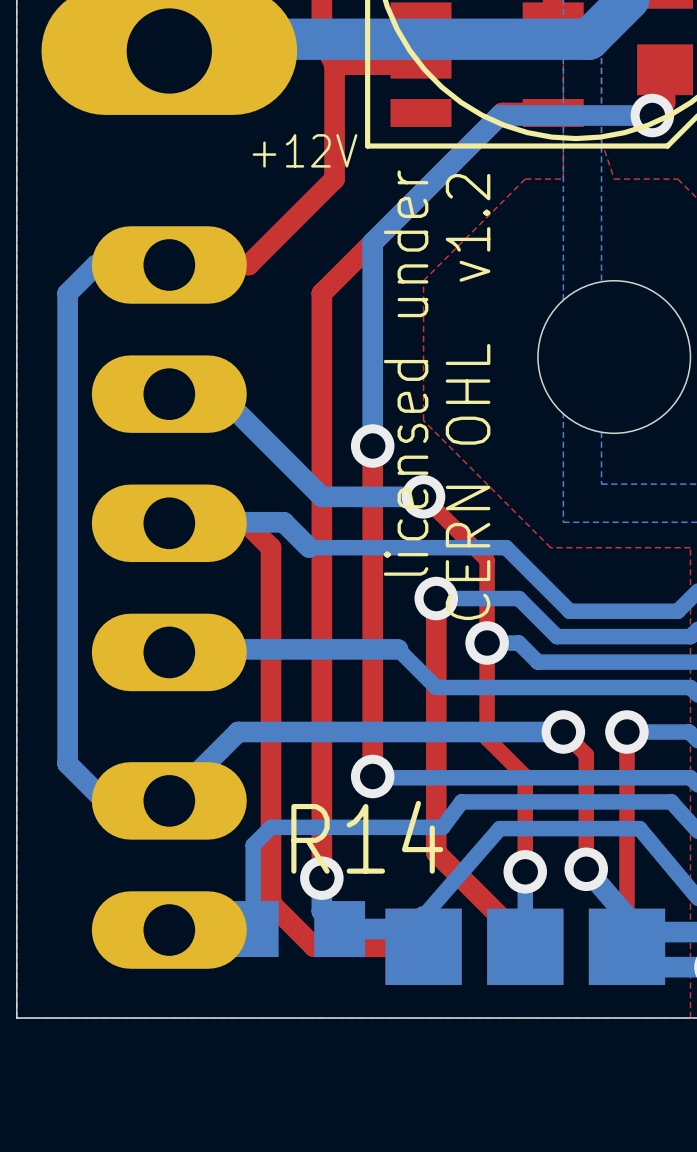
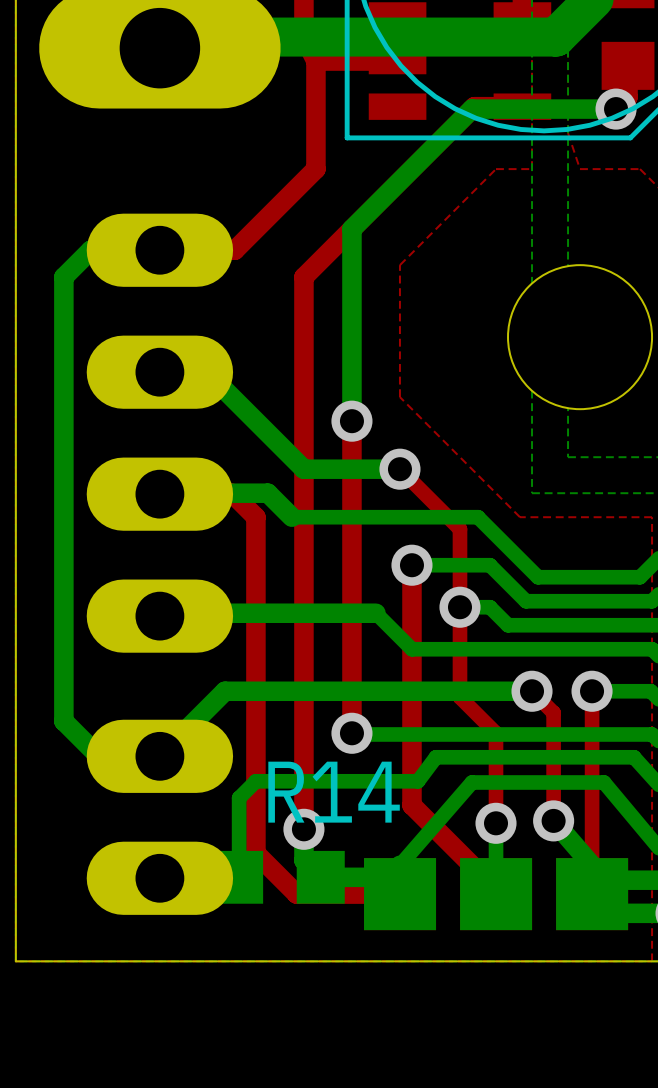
text: +12V (305, 150) -> none
text: licensed under (406, 373) -> none
text: CERN OHL v1.2 (468, 397) -> none

